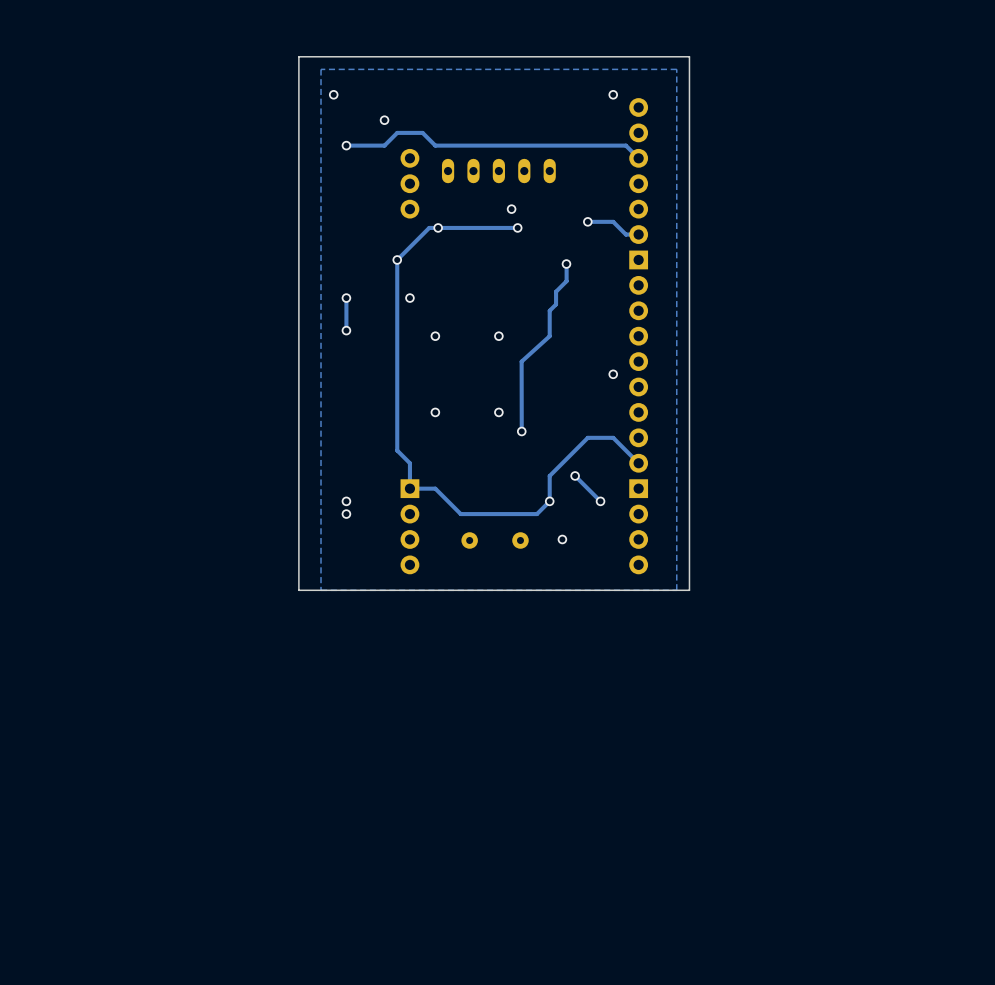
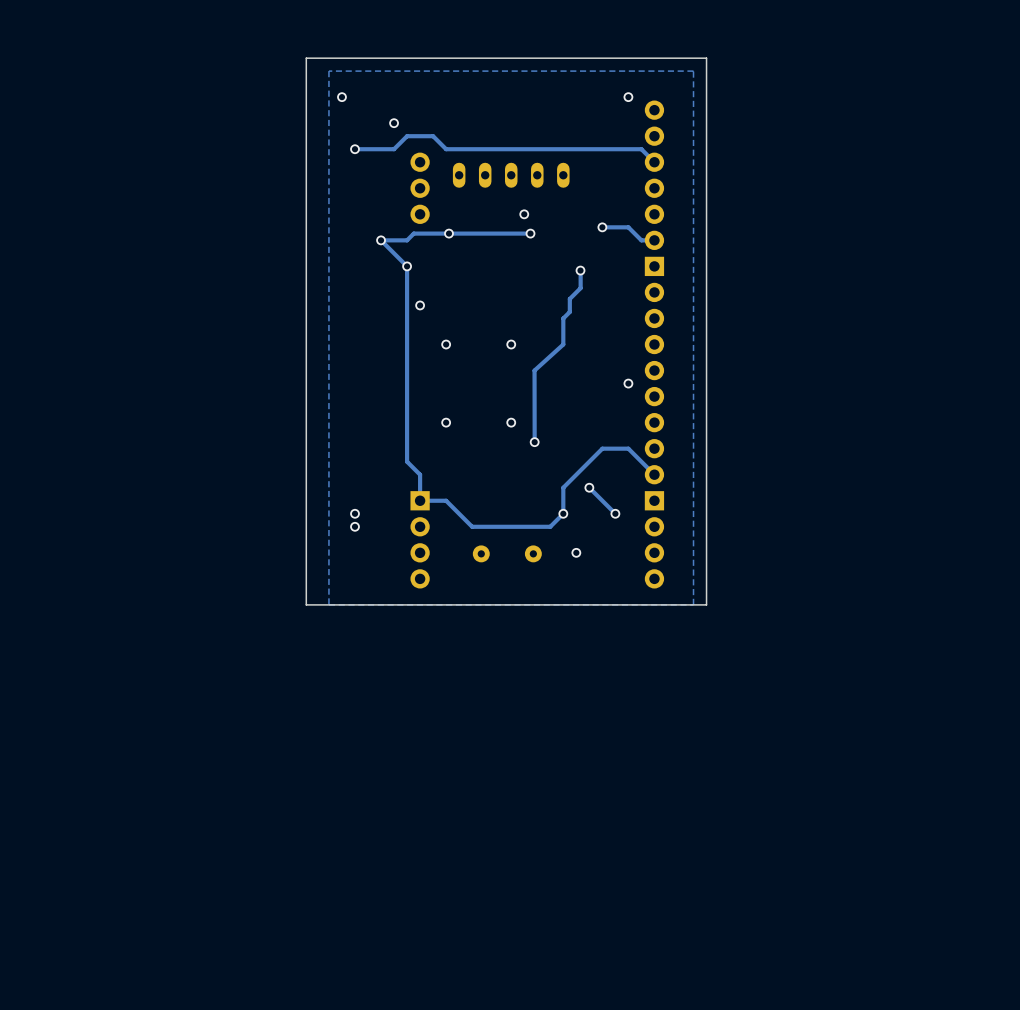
track: (429, 227) (397, 259) -> (439, 233) (413, 233) (407, 240) (381, 240) (407, 266)
via: none -> (381, 240)
track: (346, 298) (346, 330) -> none
via: (346, 298) -> none
via: (346, 330) -> none

